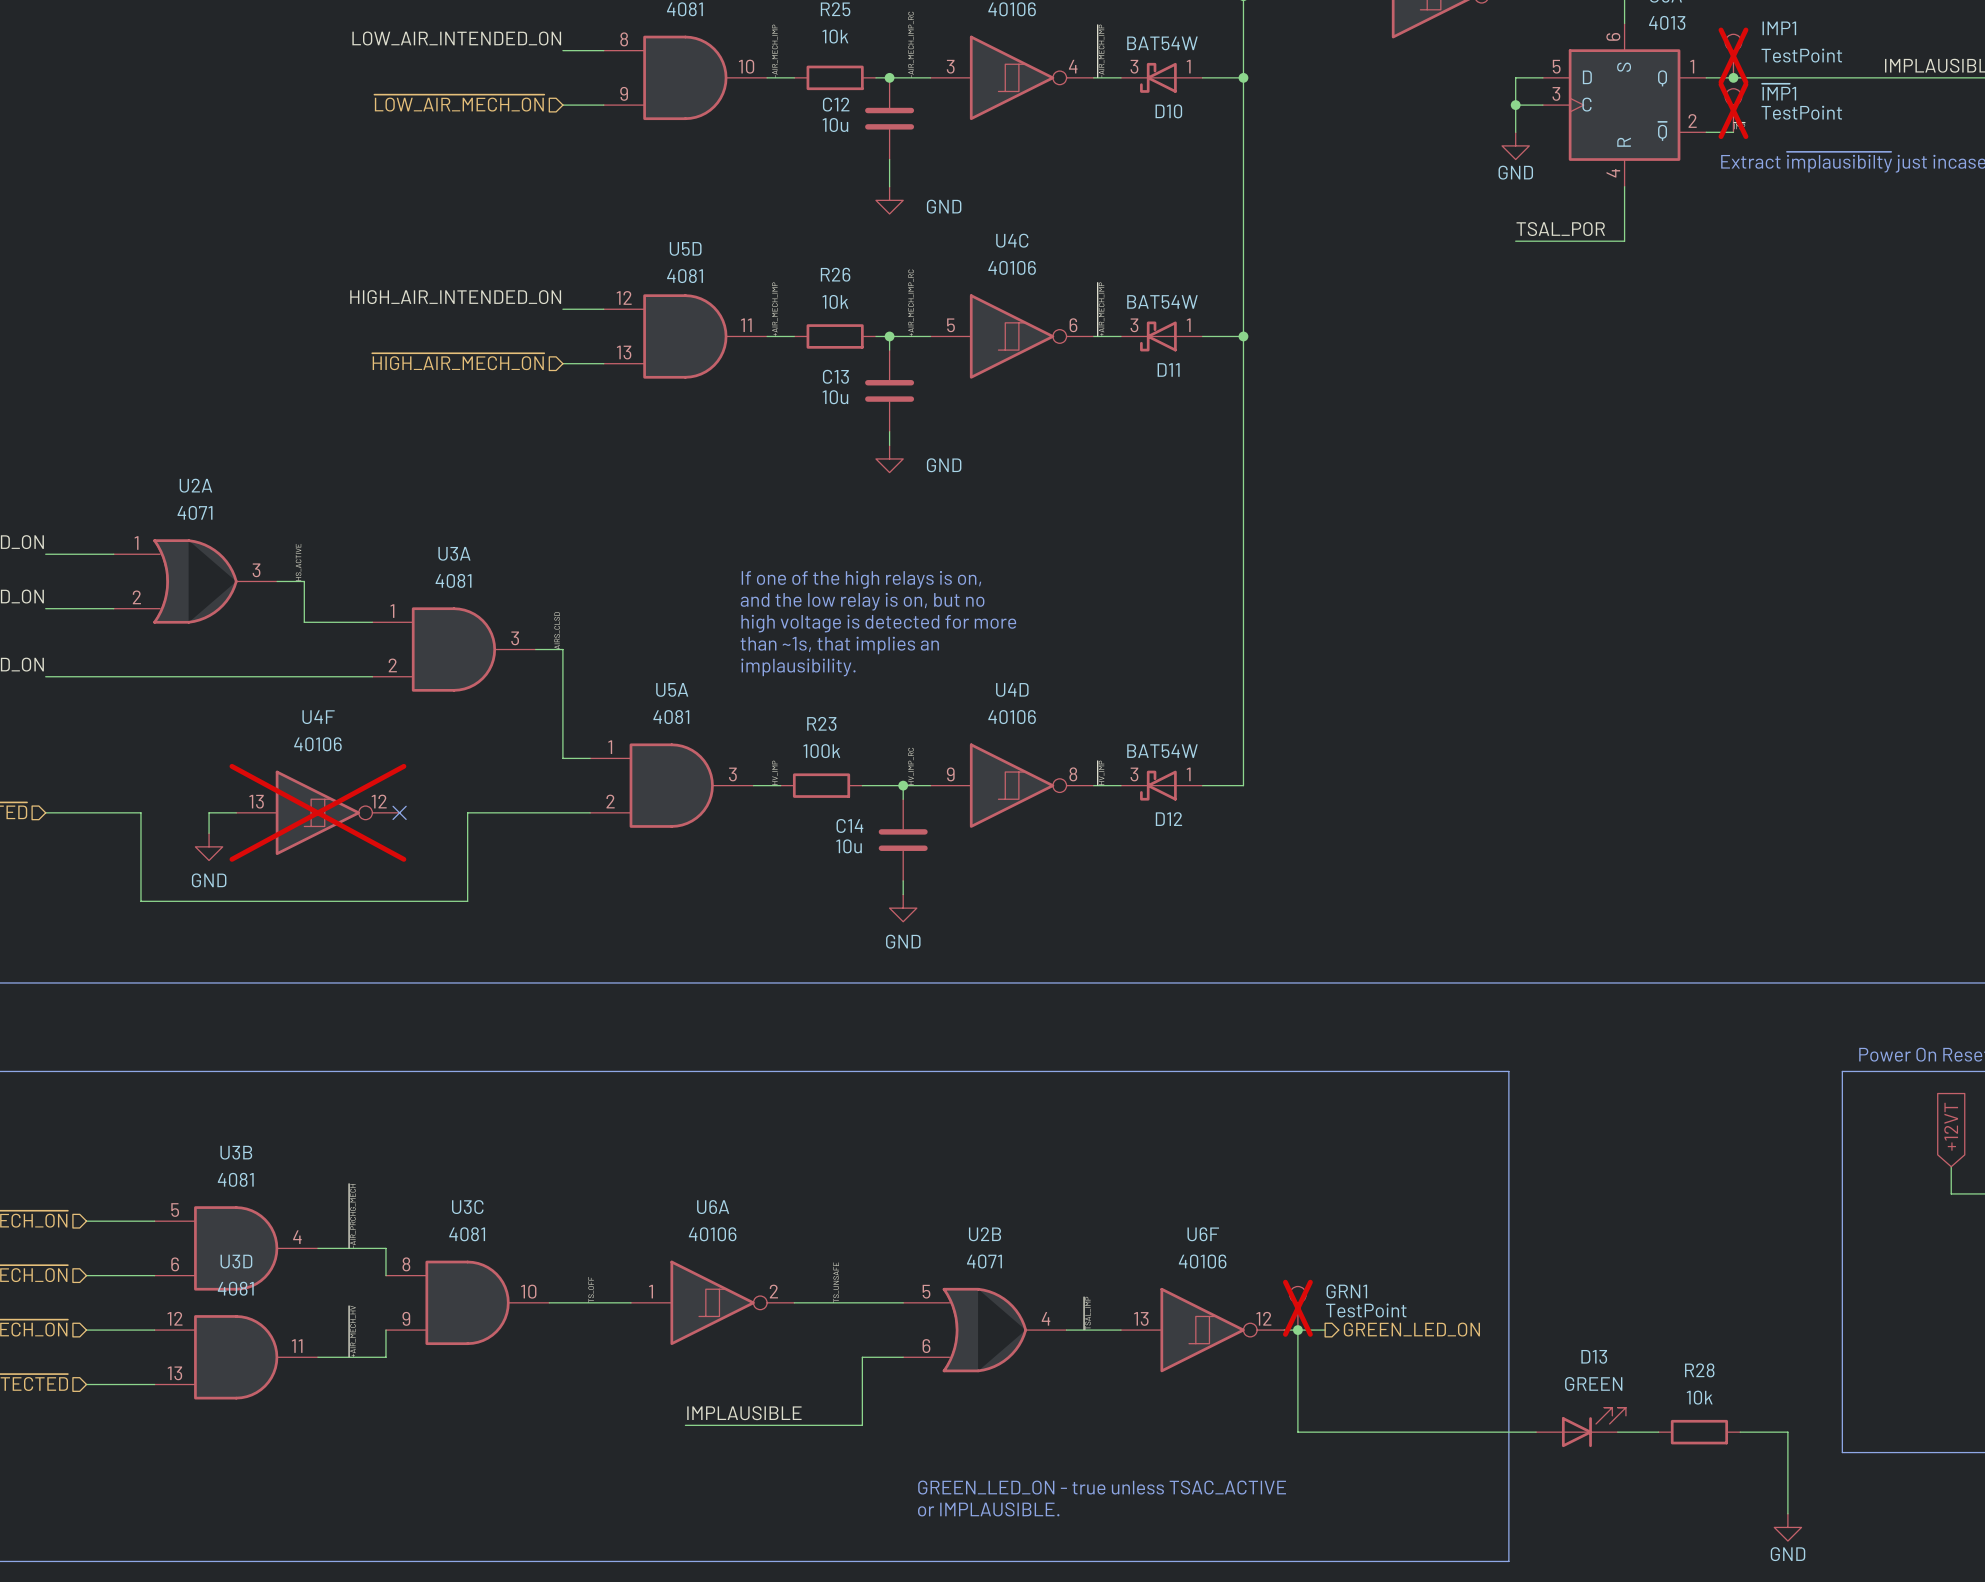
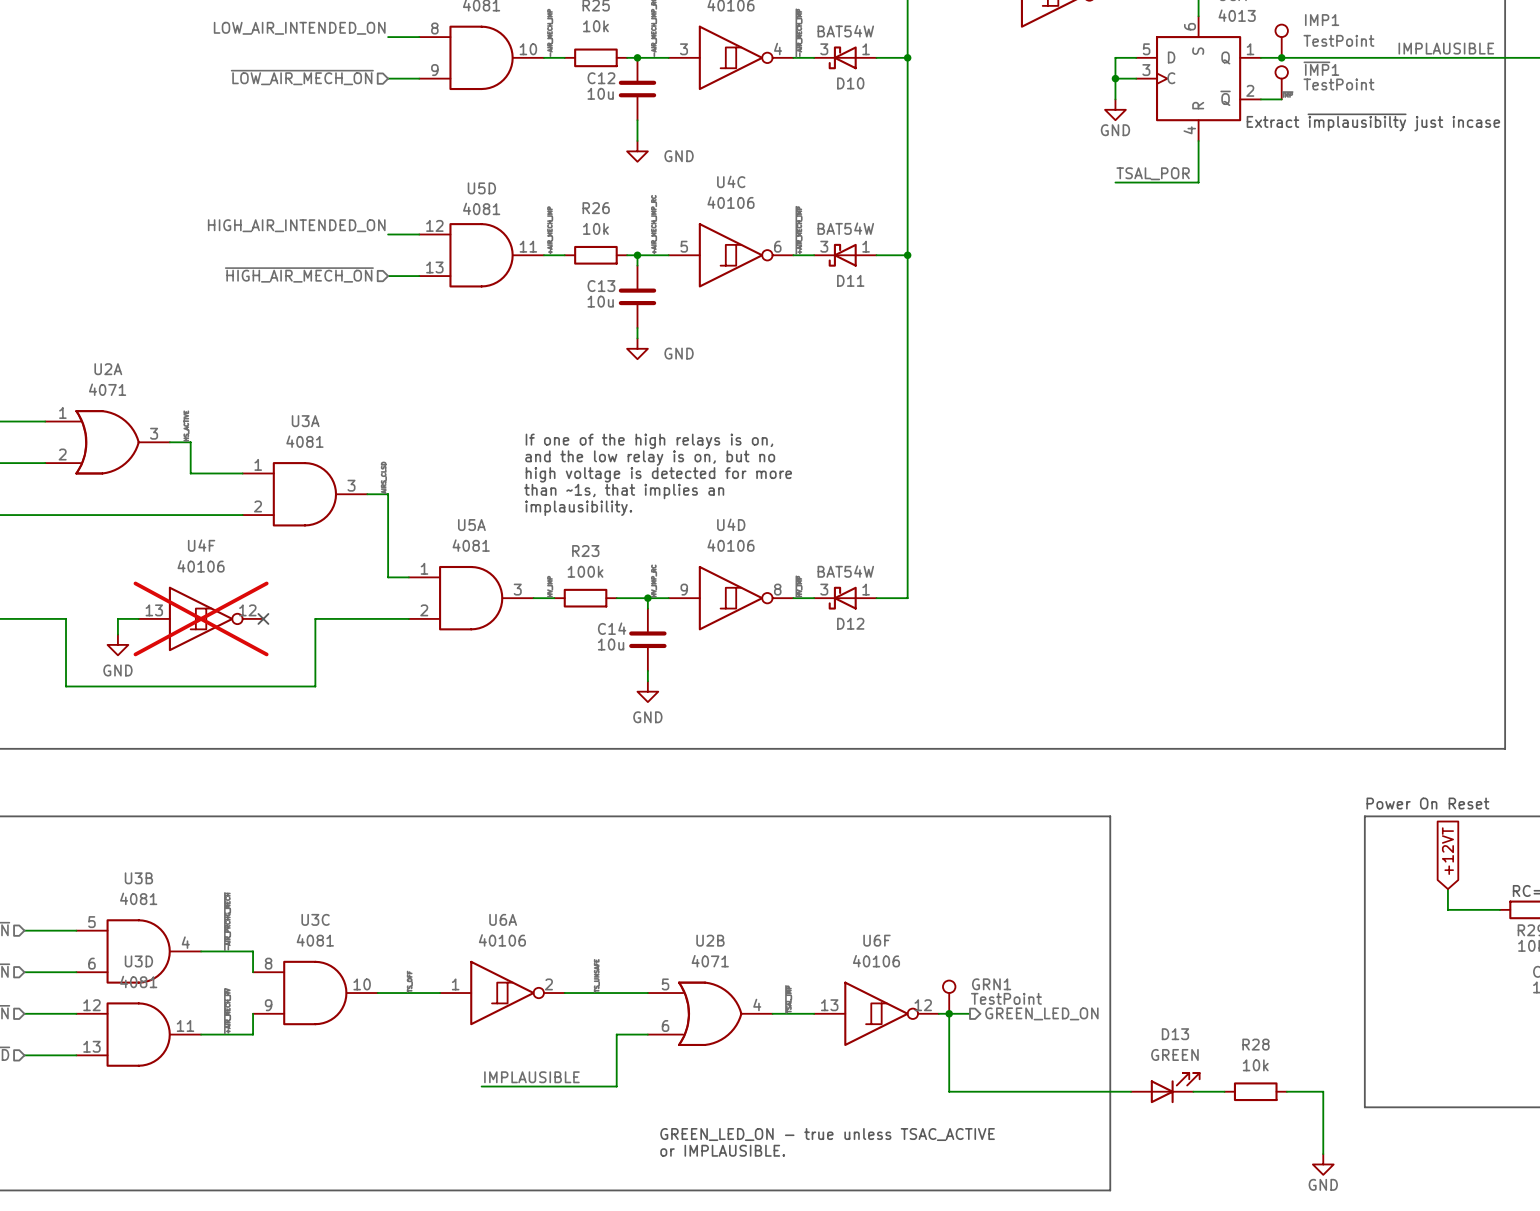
IMP1 do-not-place cross: (1733, 56) -> none
~{IMP}1 do-not-place cross: (1733, 110) -> none
GRN1 do-not-place cross: (1297, 1308) -> none

